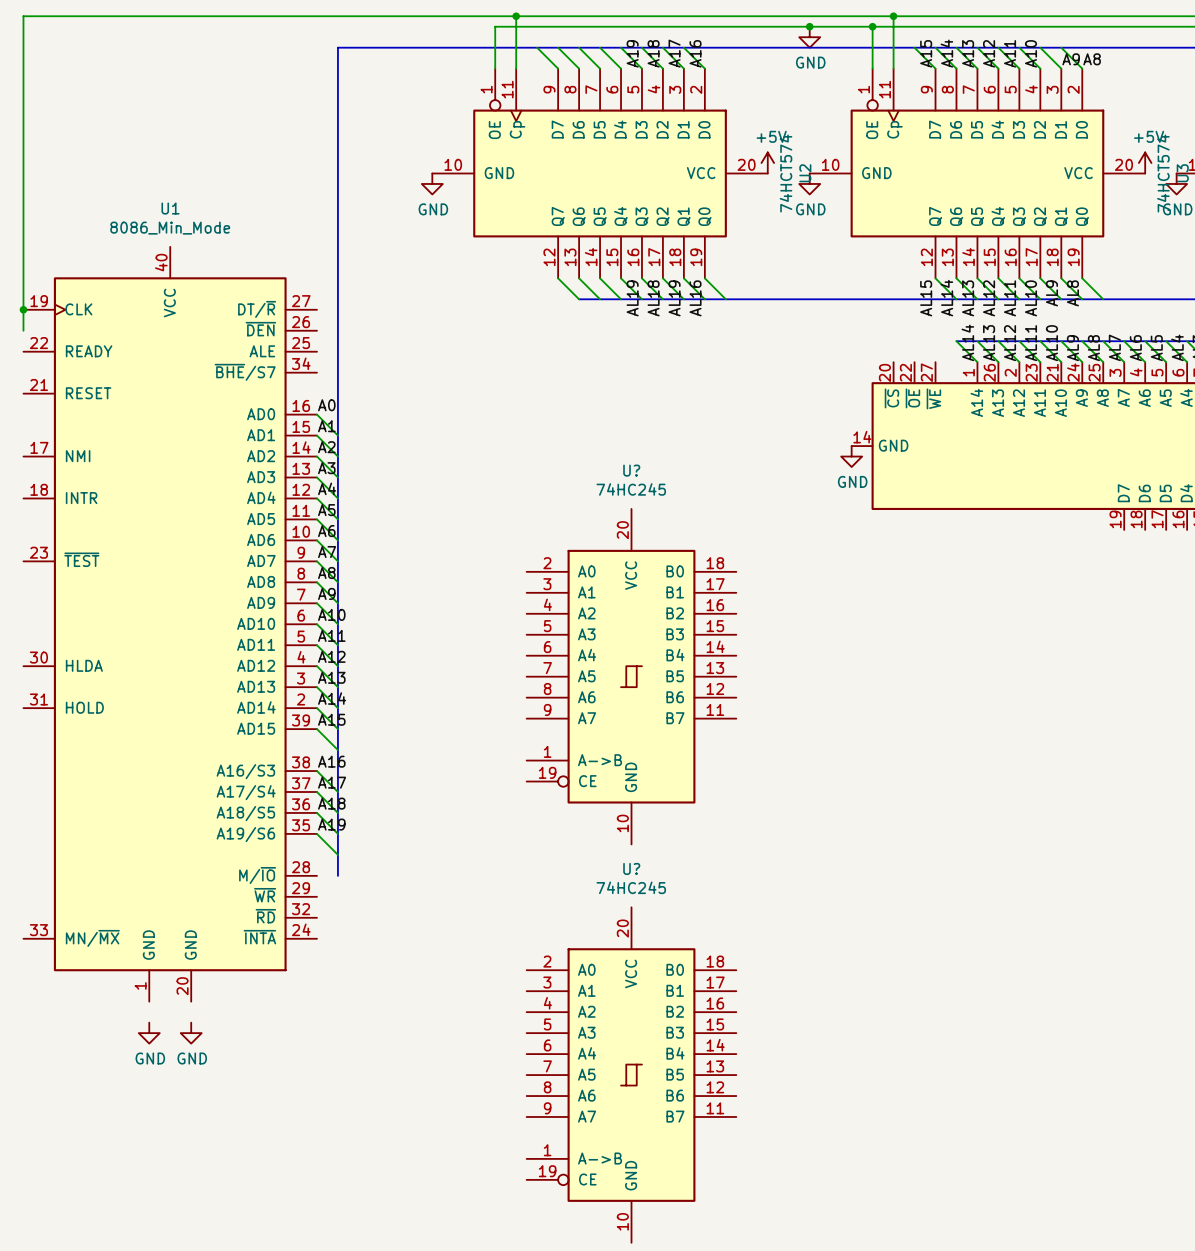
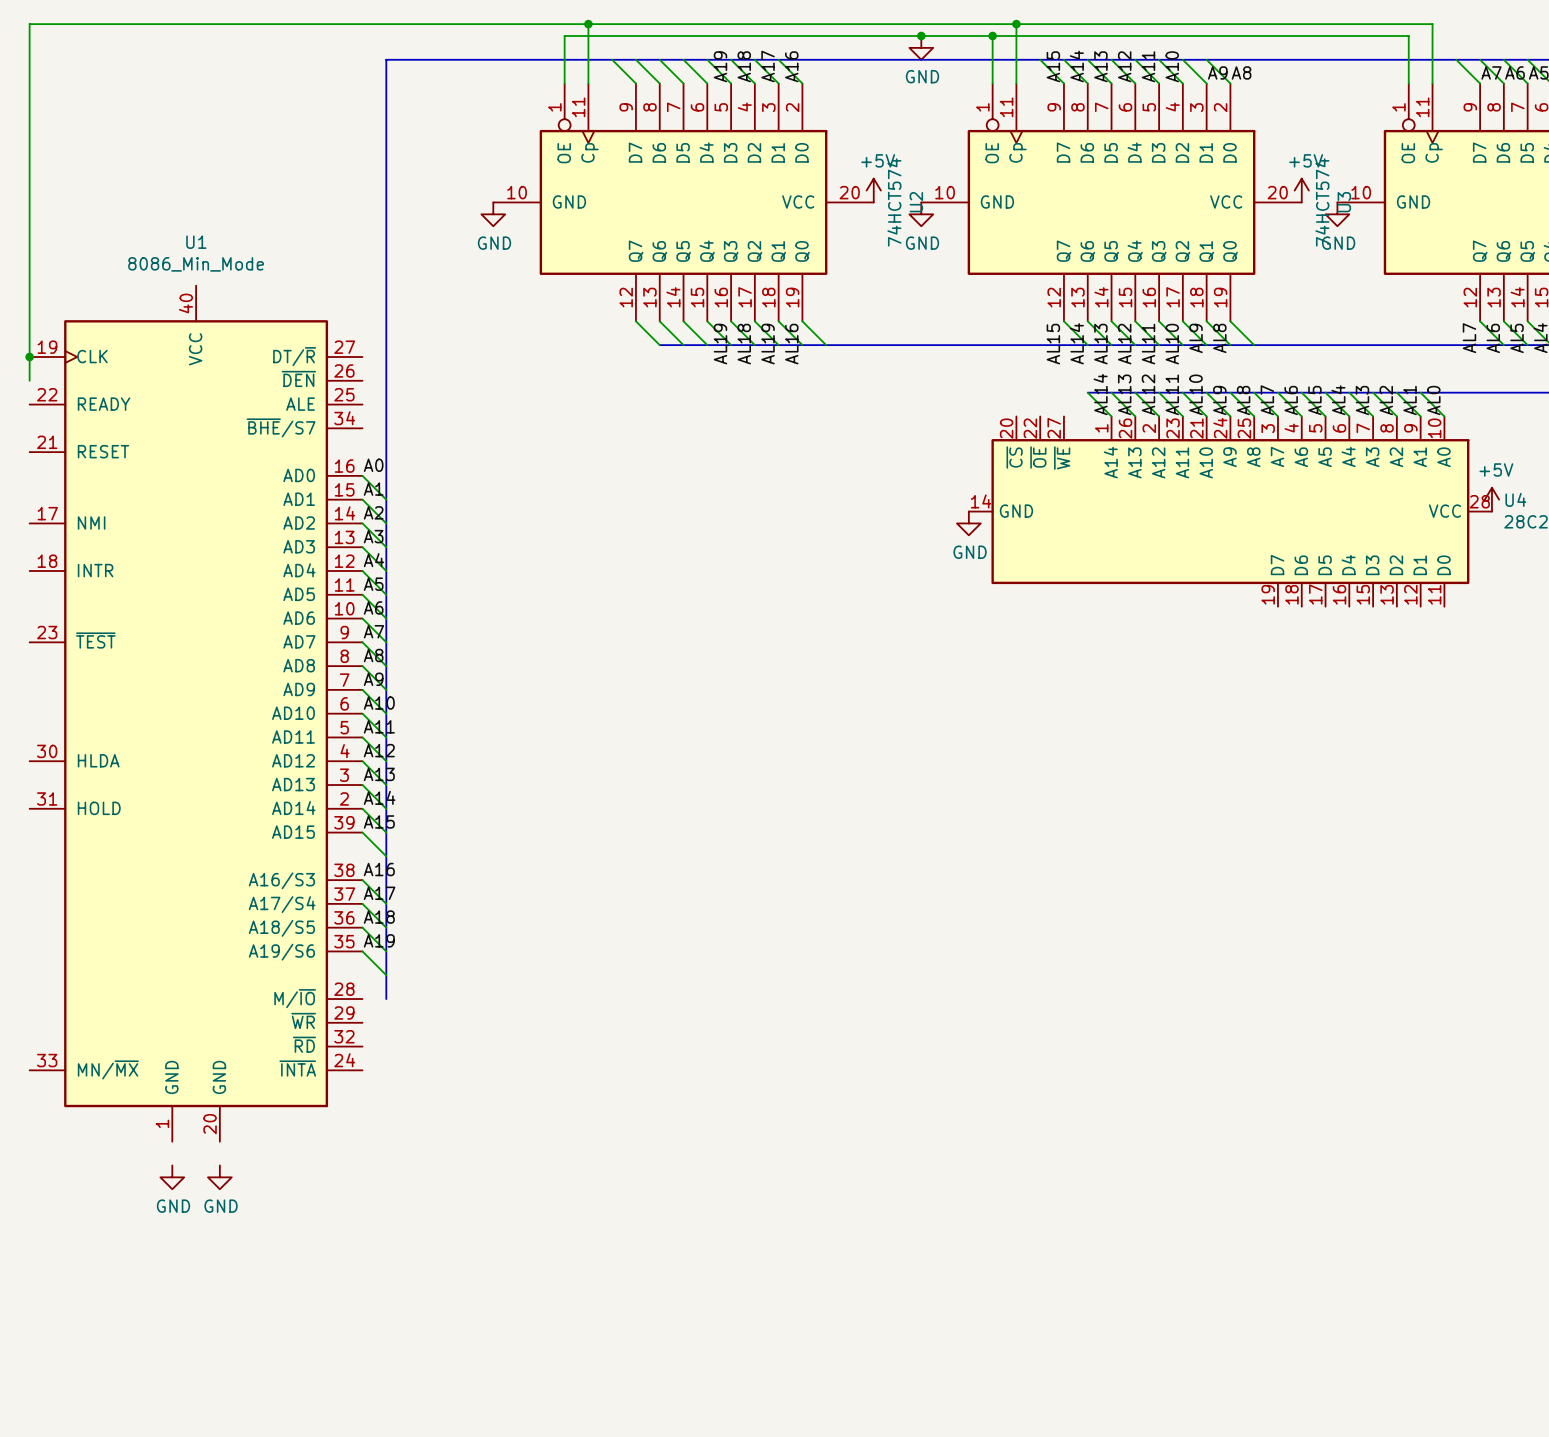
U?: 74HC245 (631, 676) -> none
U?: 74HC245 (631, 1075) -> none

